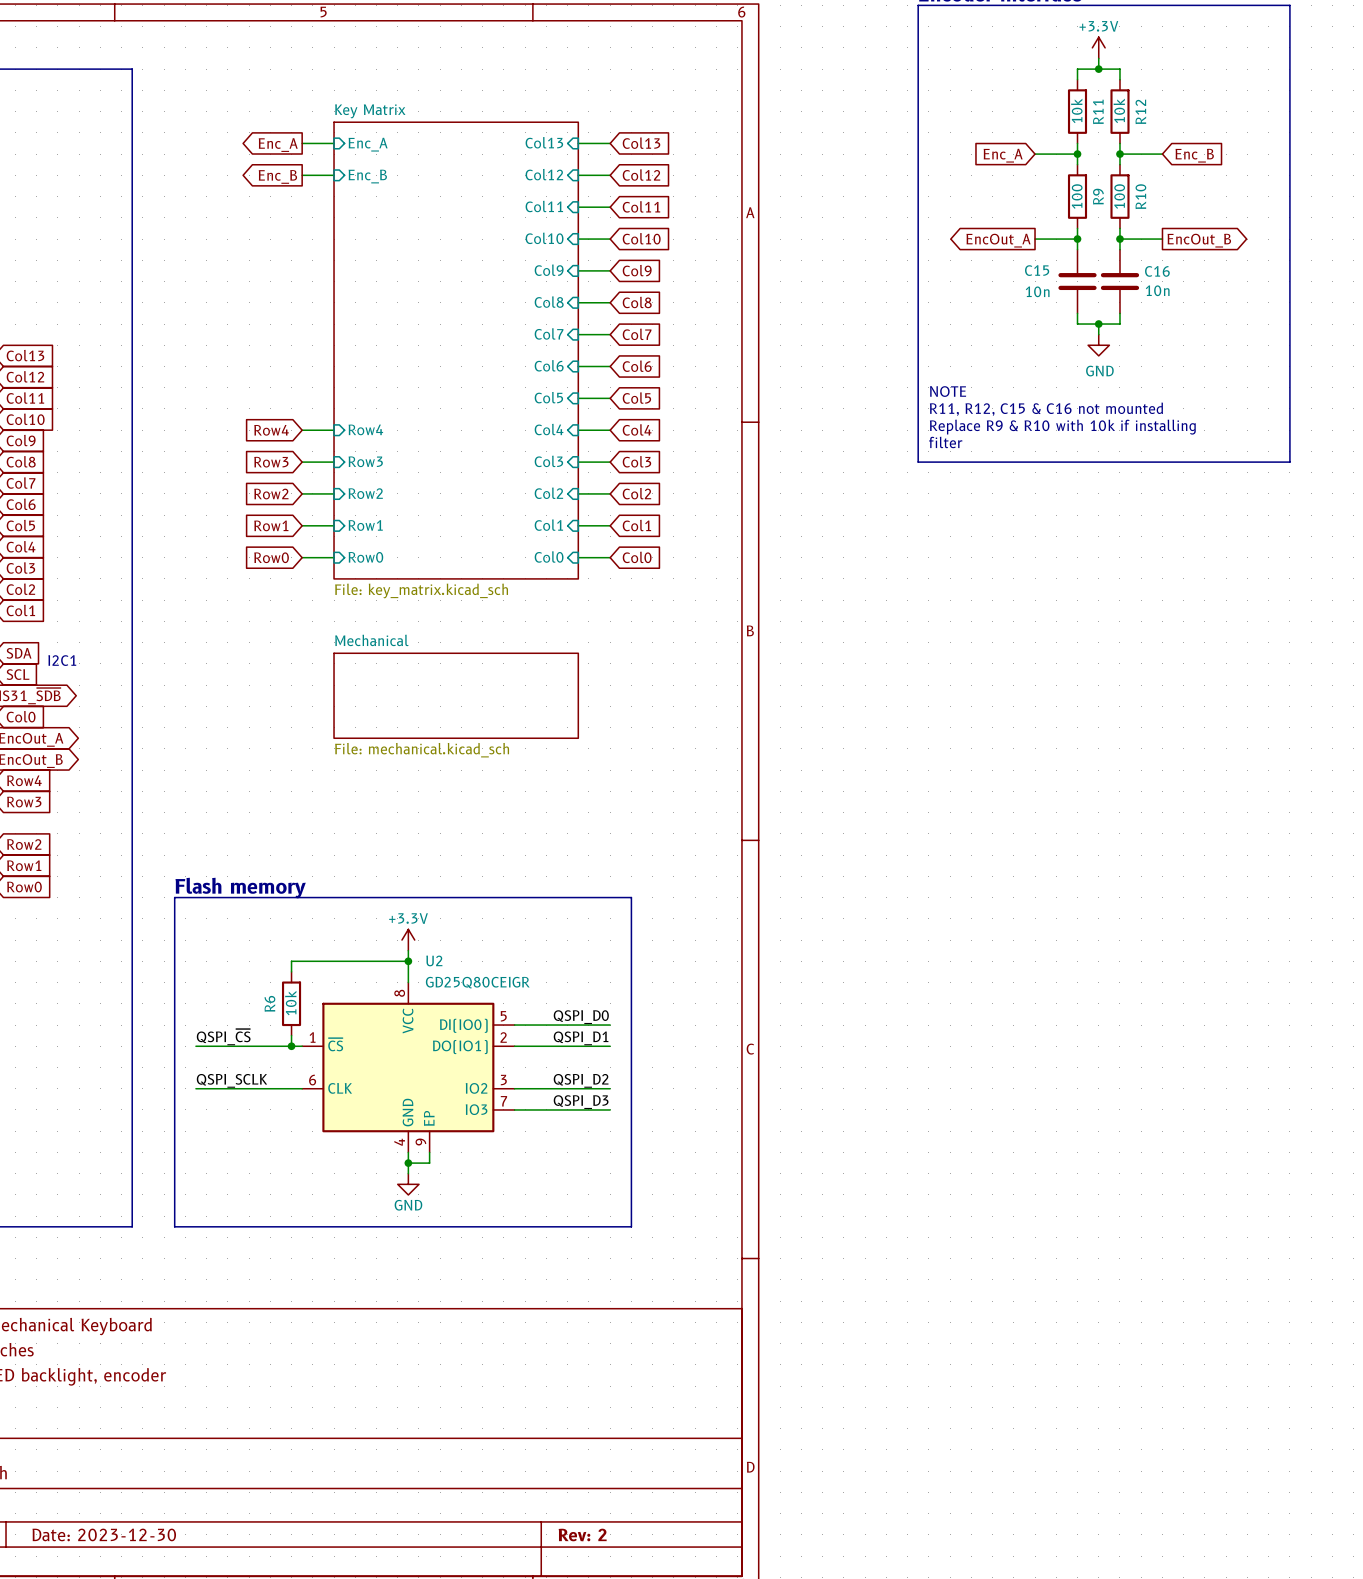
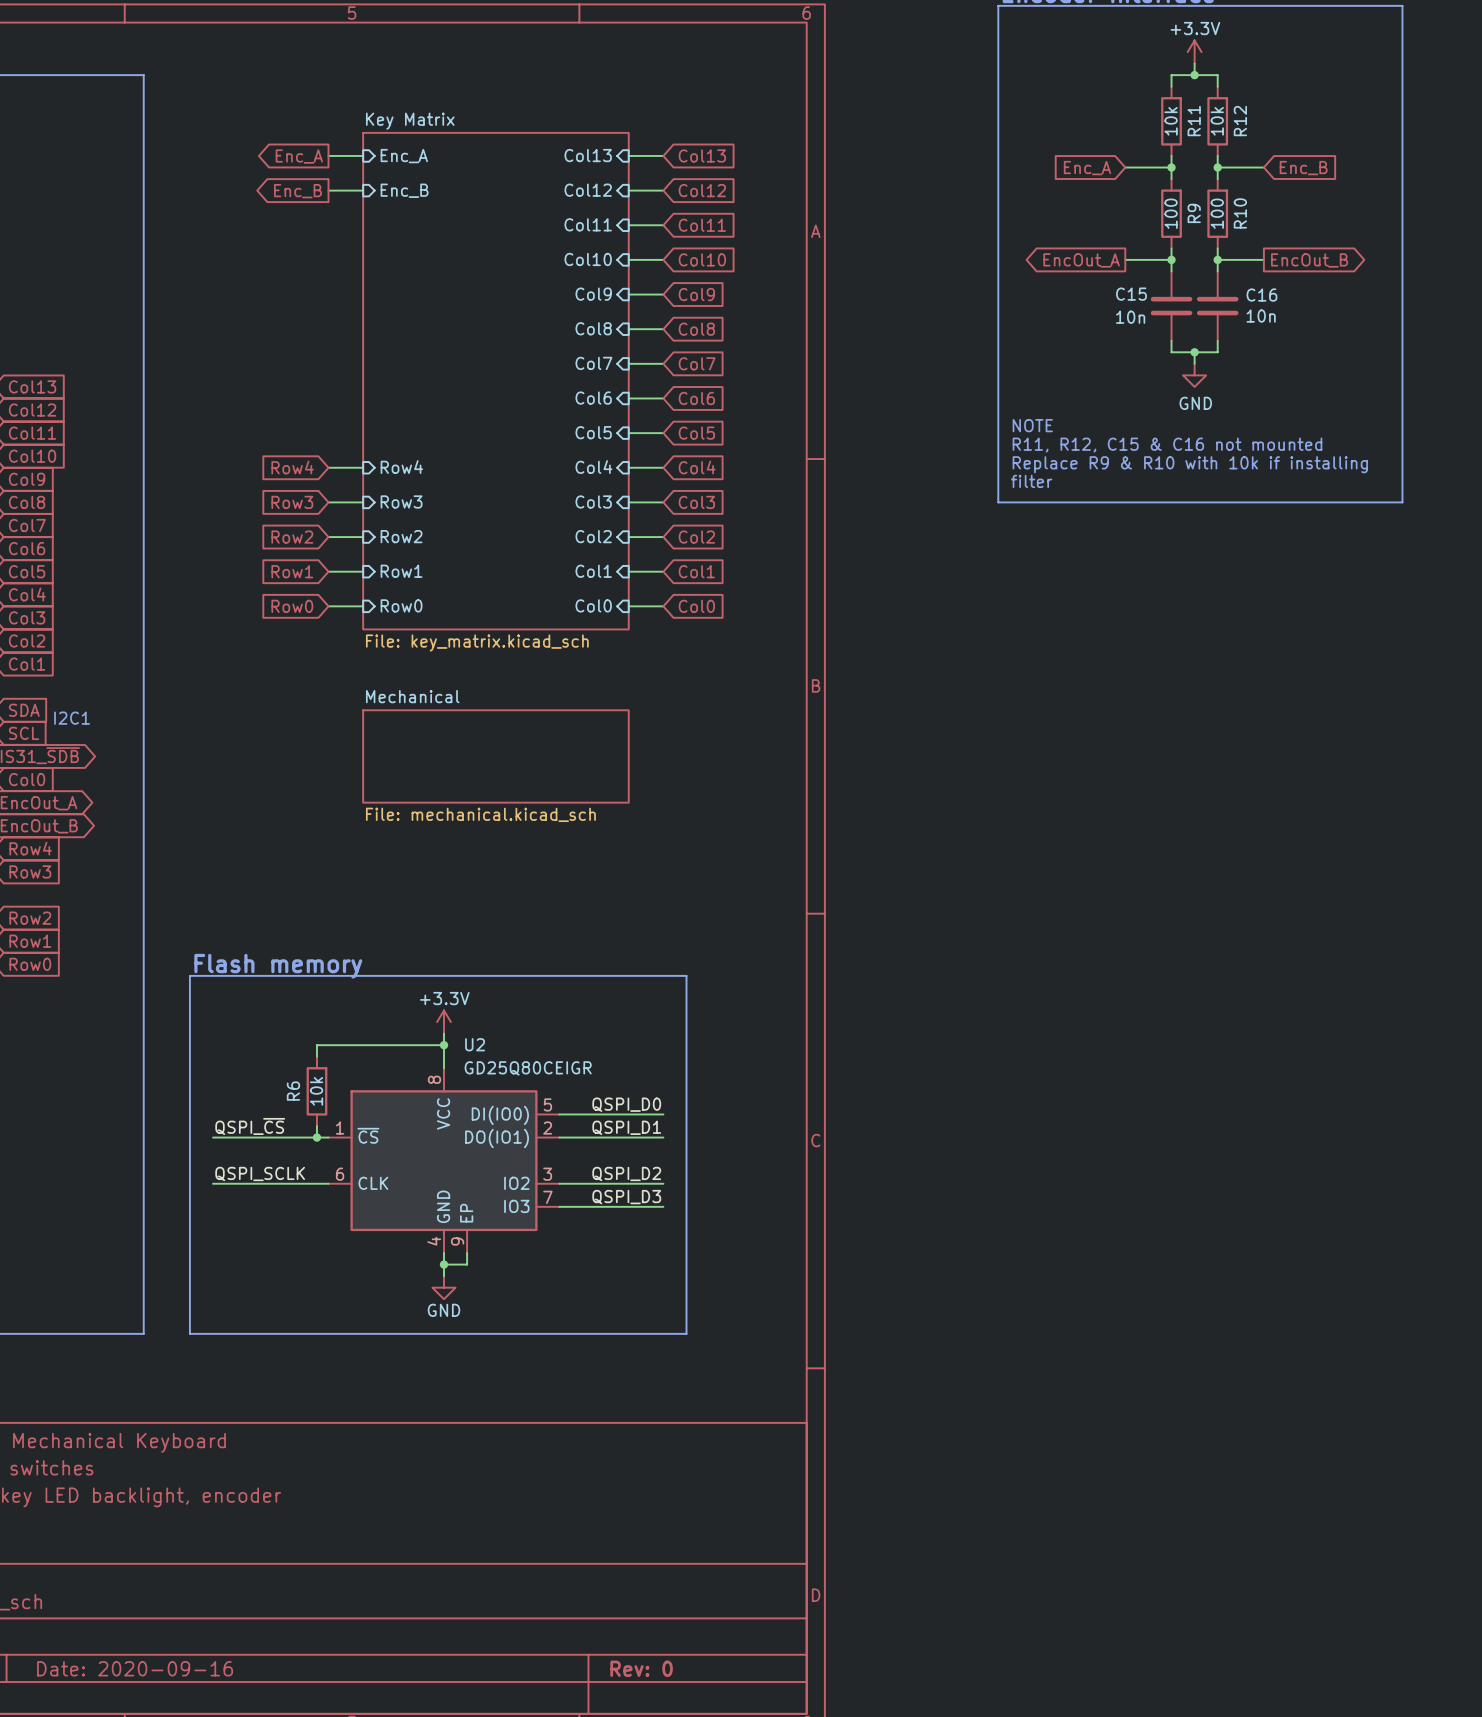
title block: Date: 2023-12-30 (104, 1534) -> Date: 2020-09-16 (135, 1668)
title block: Rev: 2 (582, 1535) -> Rev: 0 (641, 1668)

